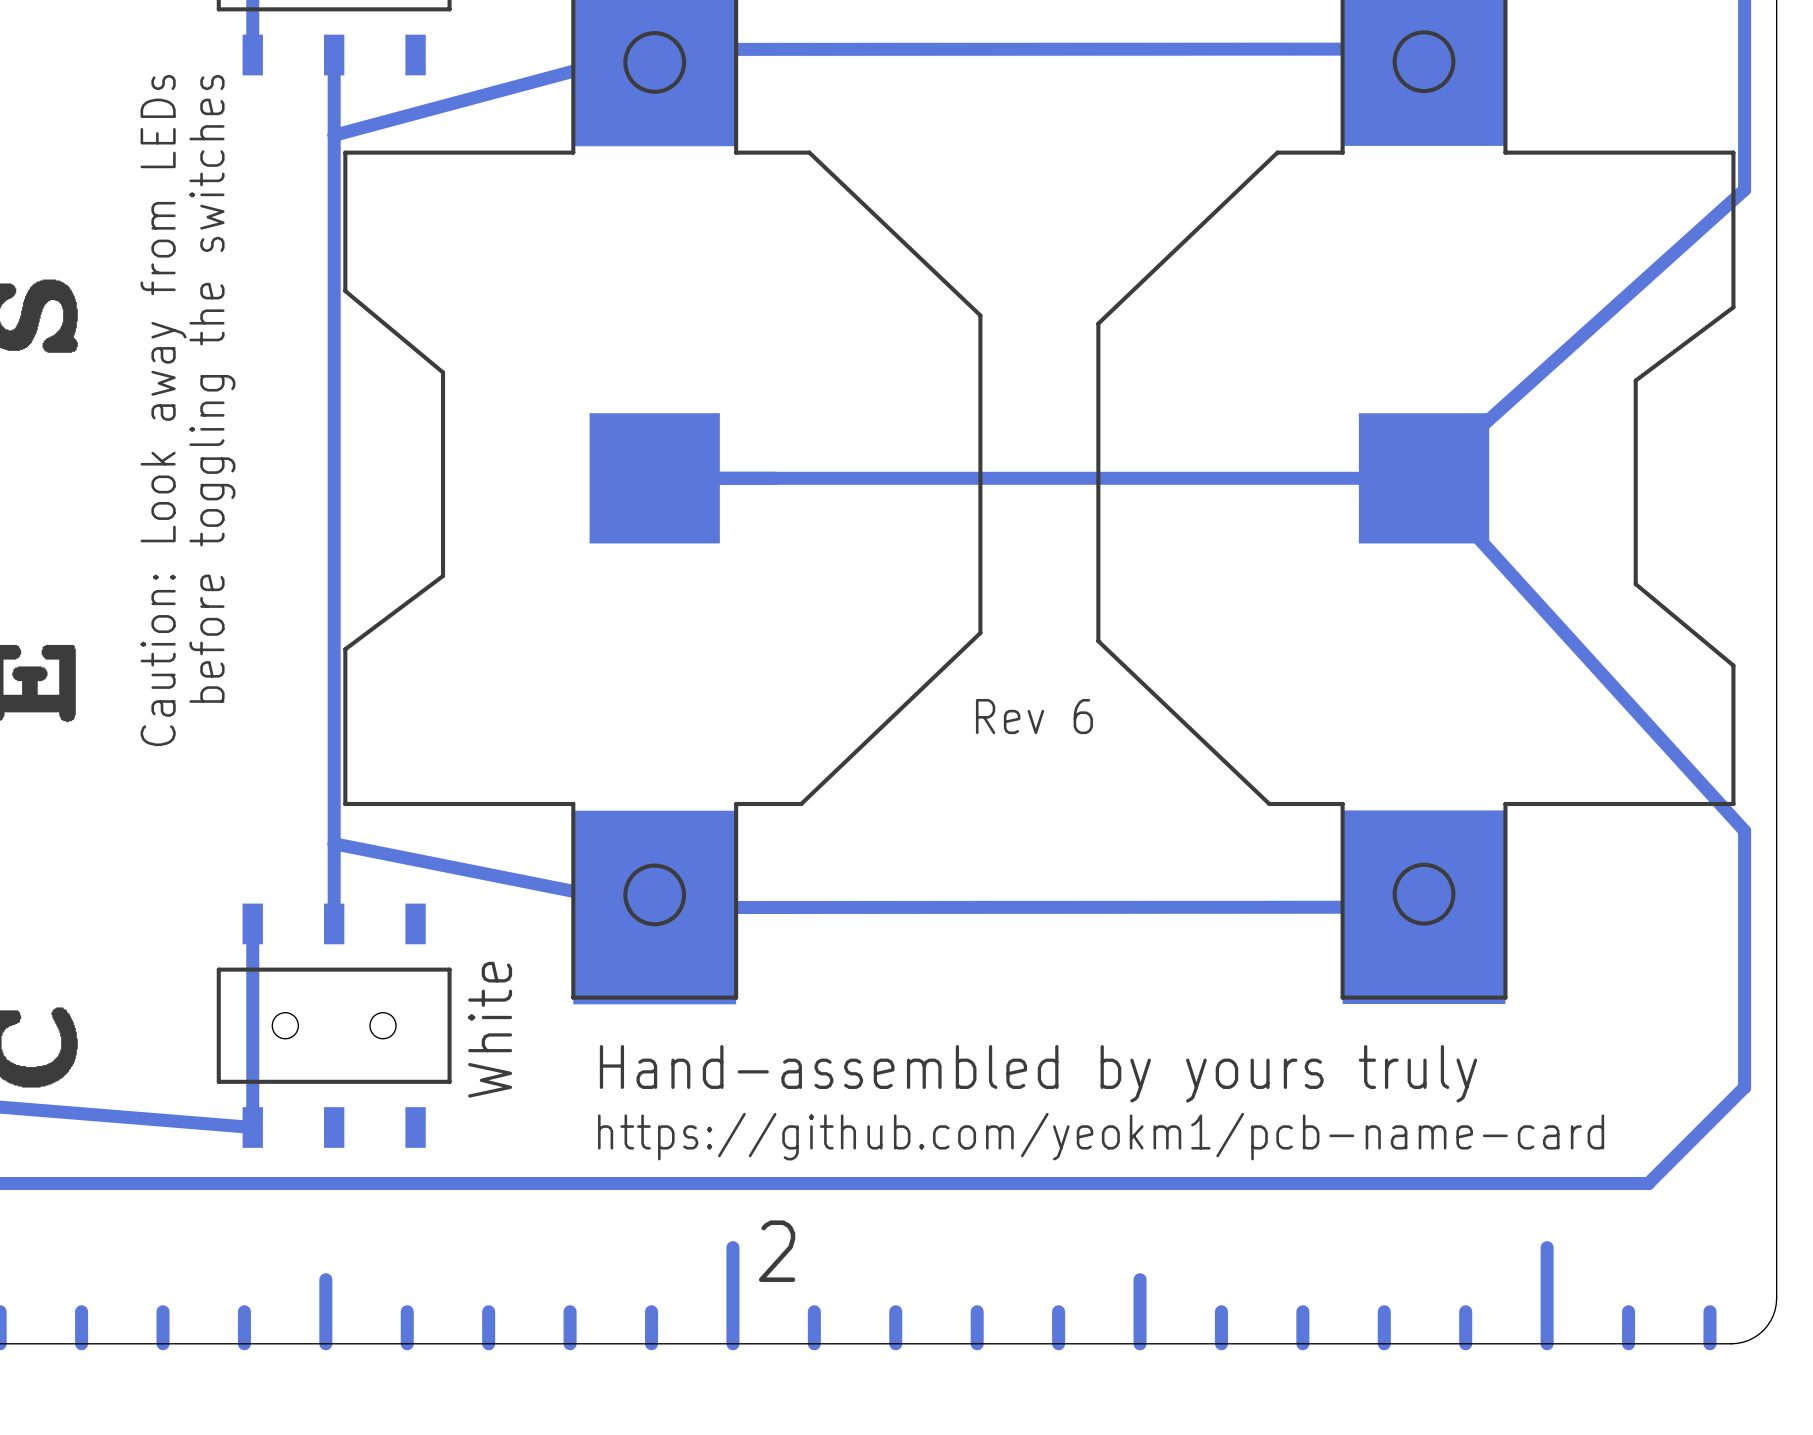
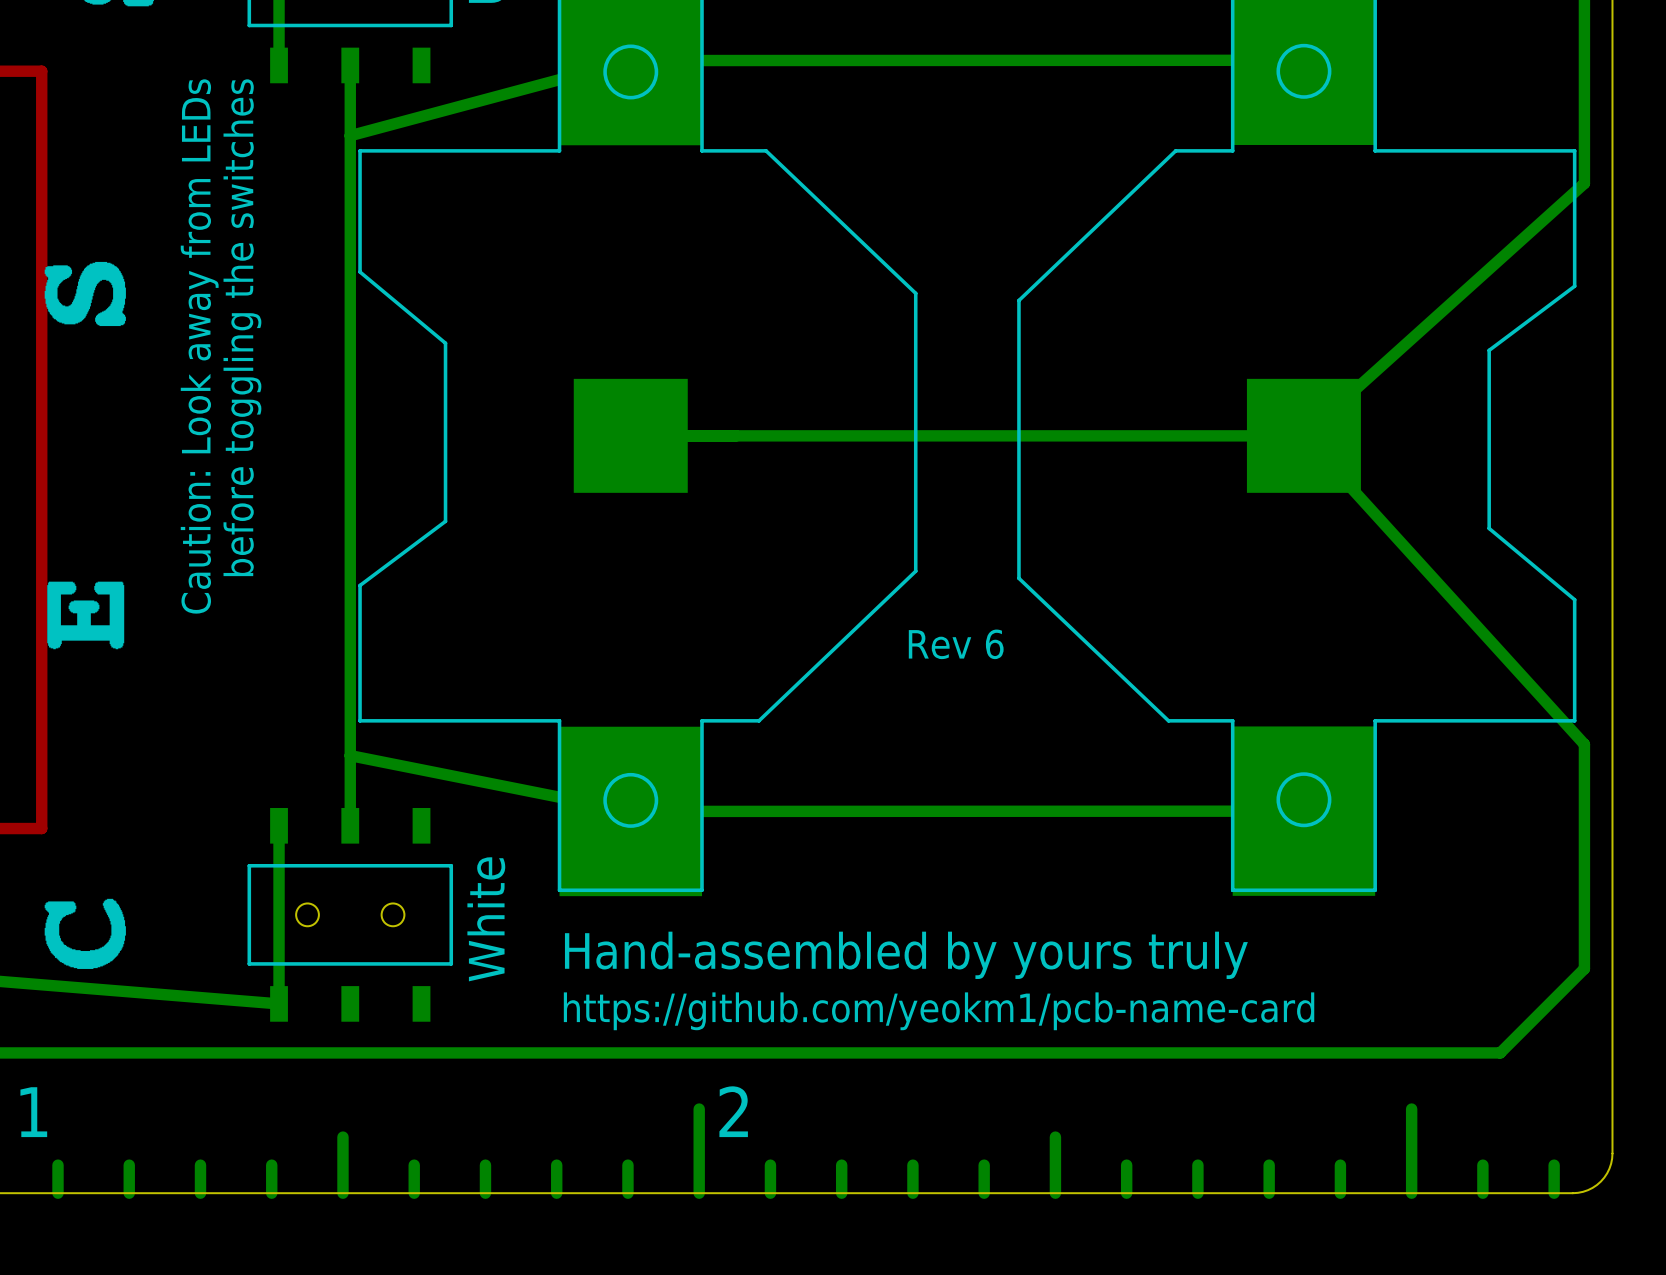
text position: Hand-assembled by yours truly (1038, 1073) -> Hand-assembled by yours truly (906, 955)
text position: https://github.com/yeokm1/pcb-name-card (1101, 1136) -> https://github.com/yeokm1/pcb-name-card (939, 1011)

